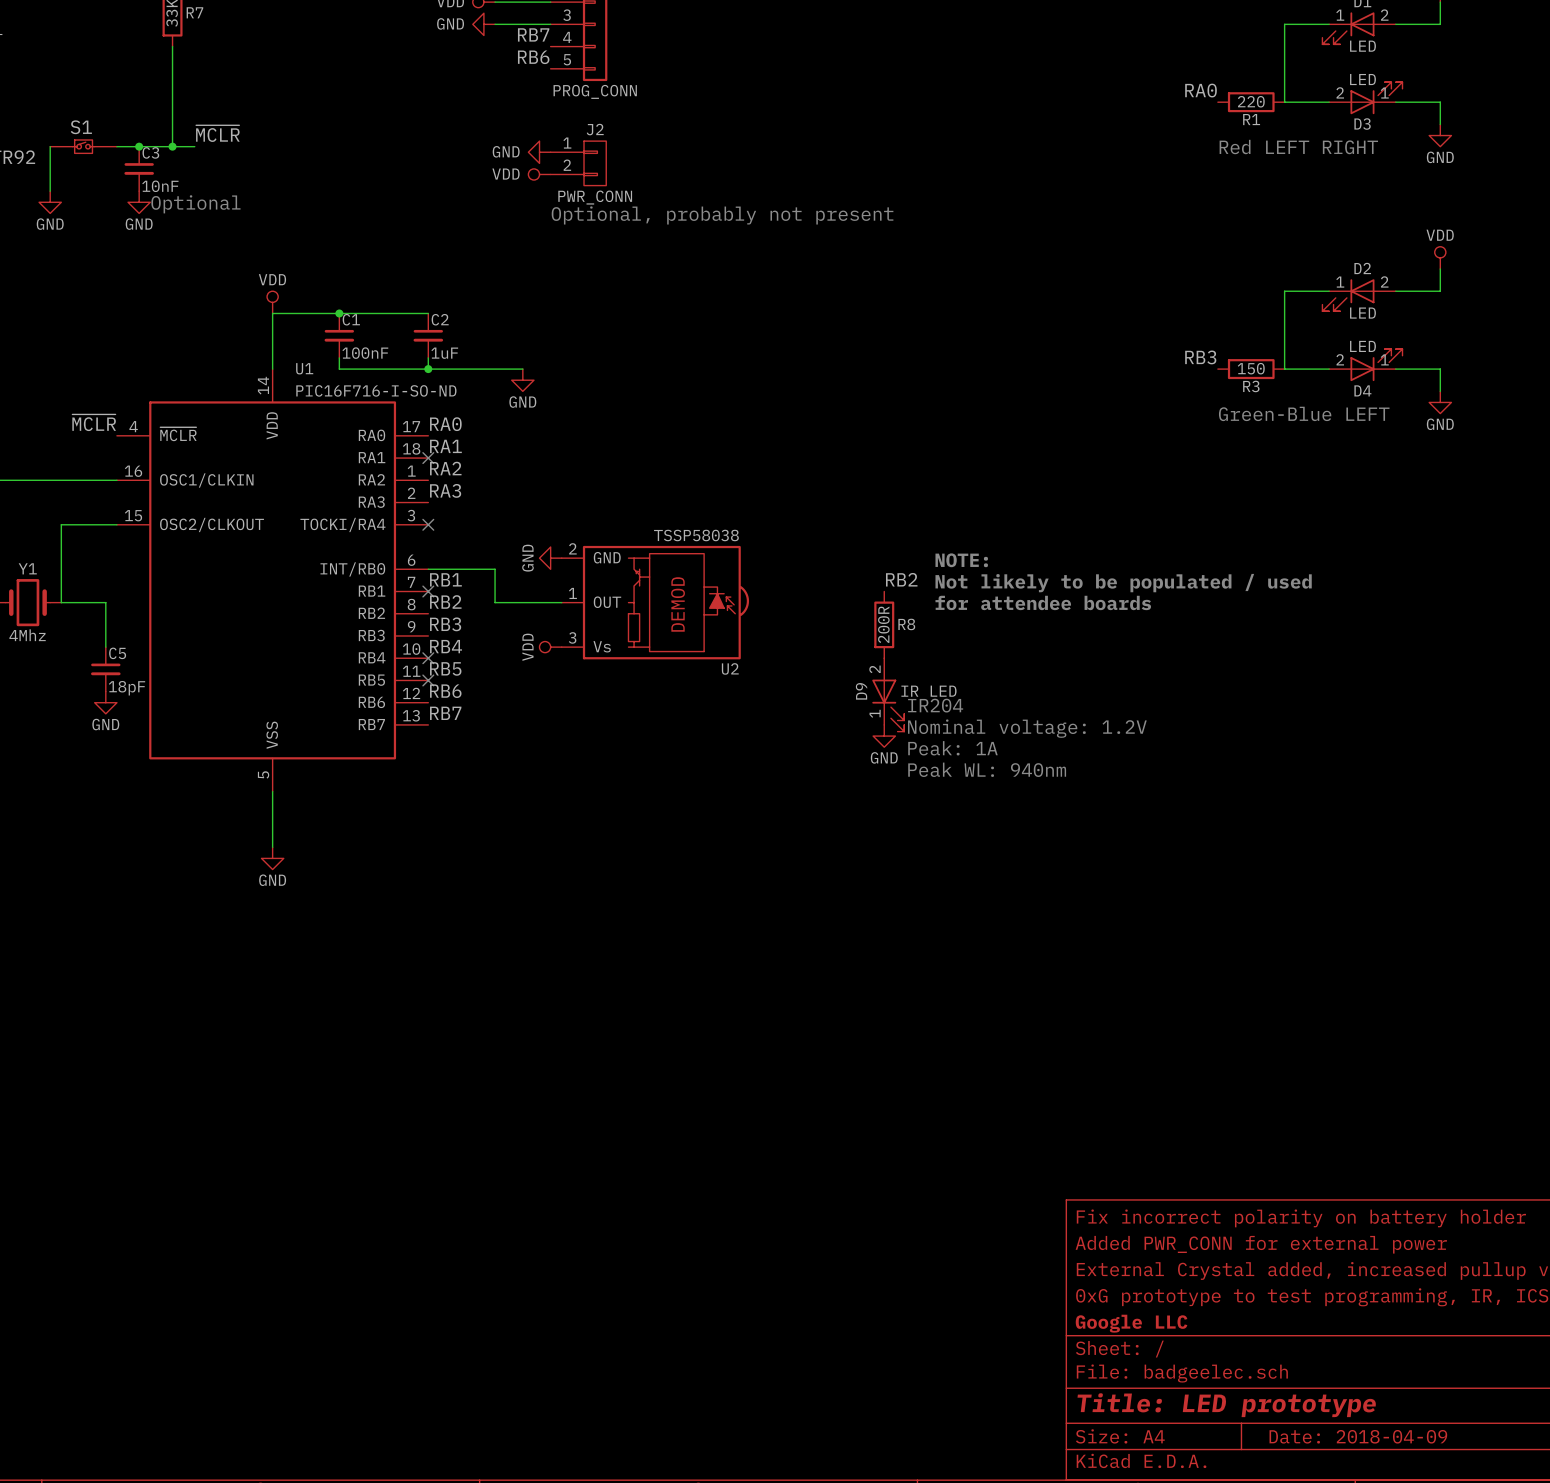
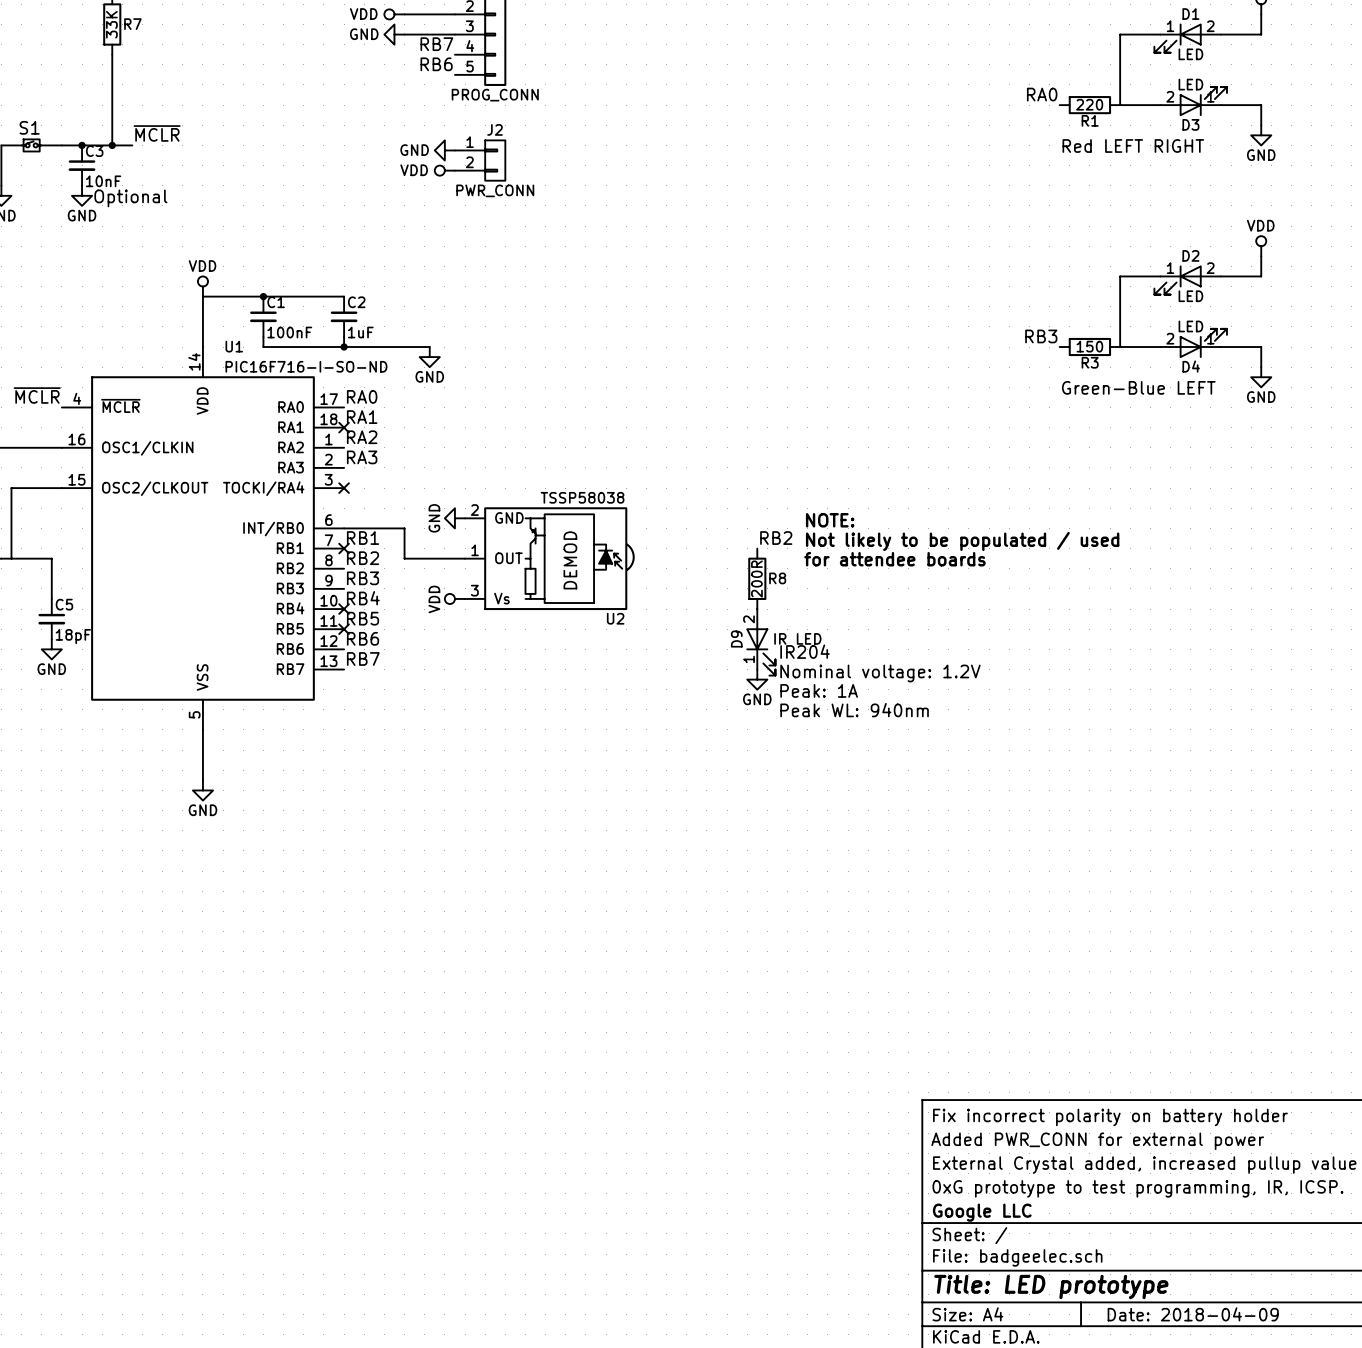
text: Optional, probably not present (722, 215) -> none

